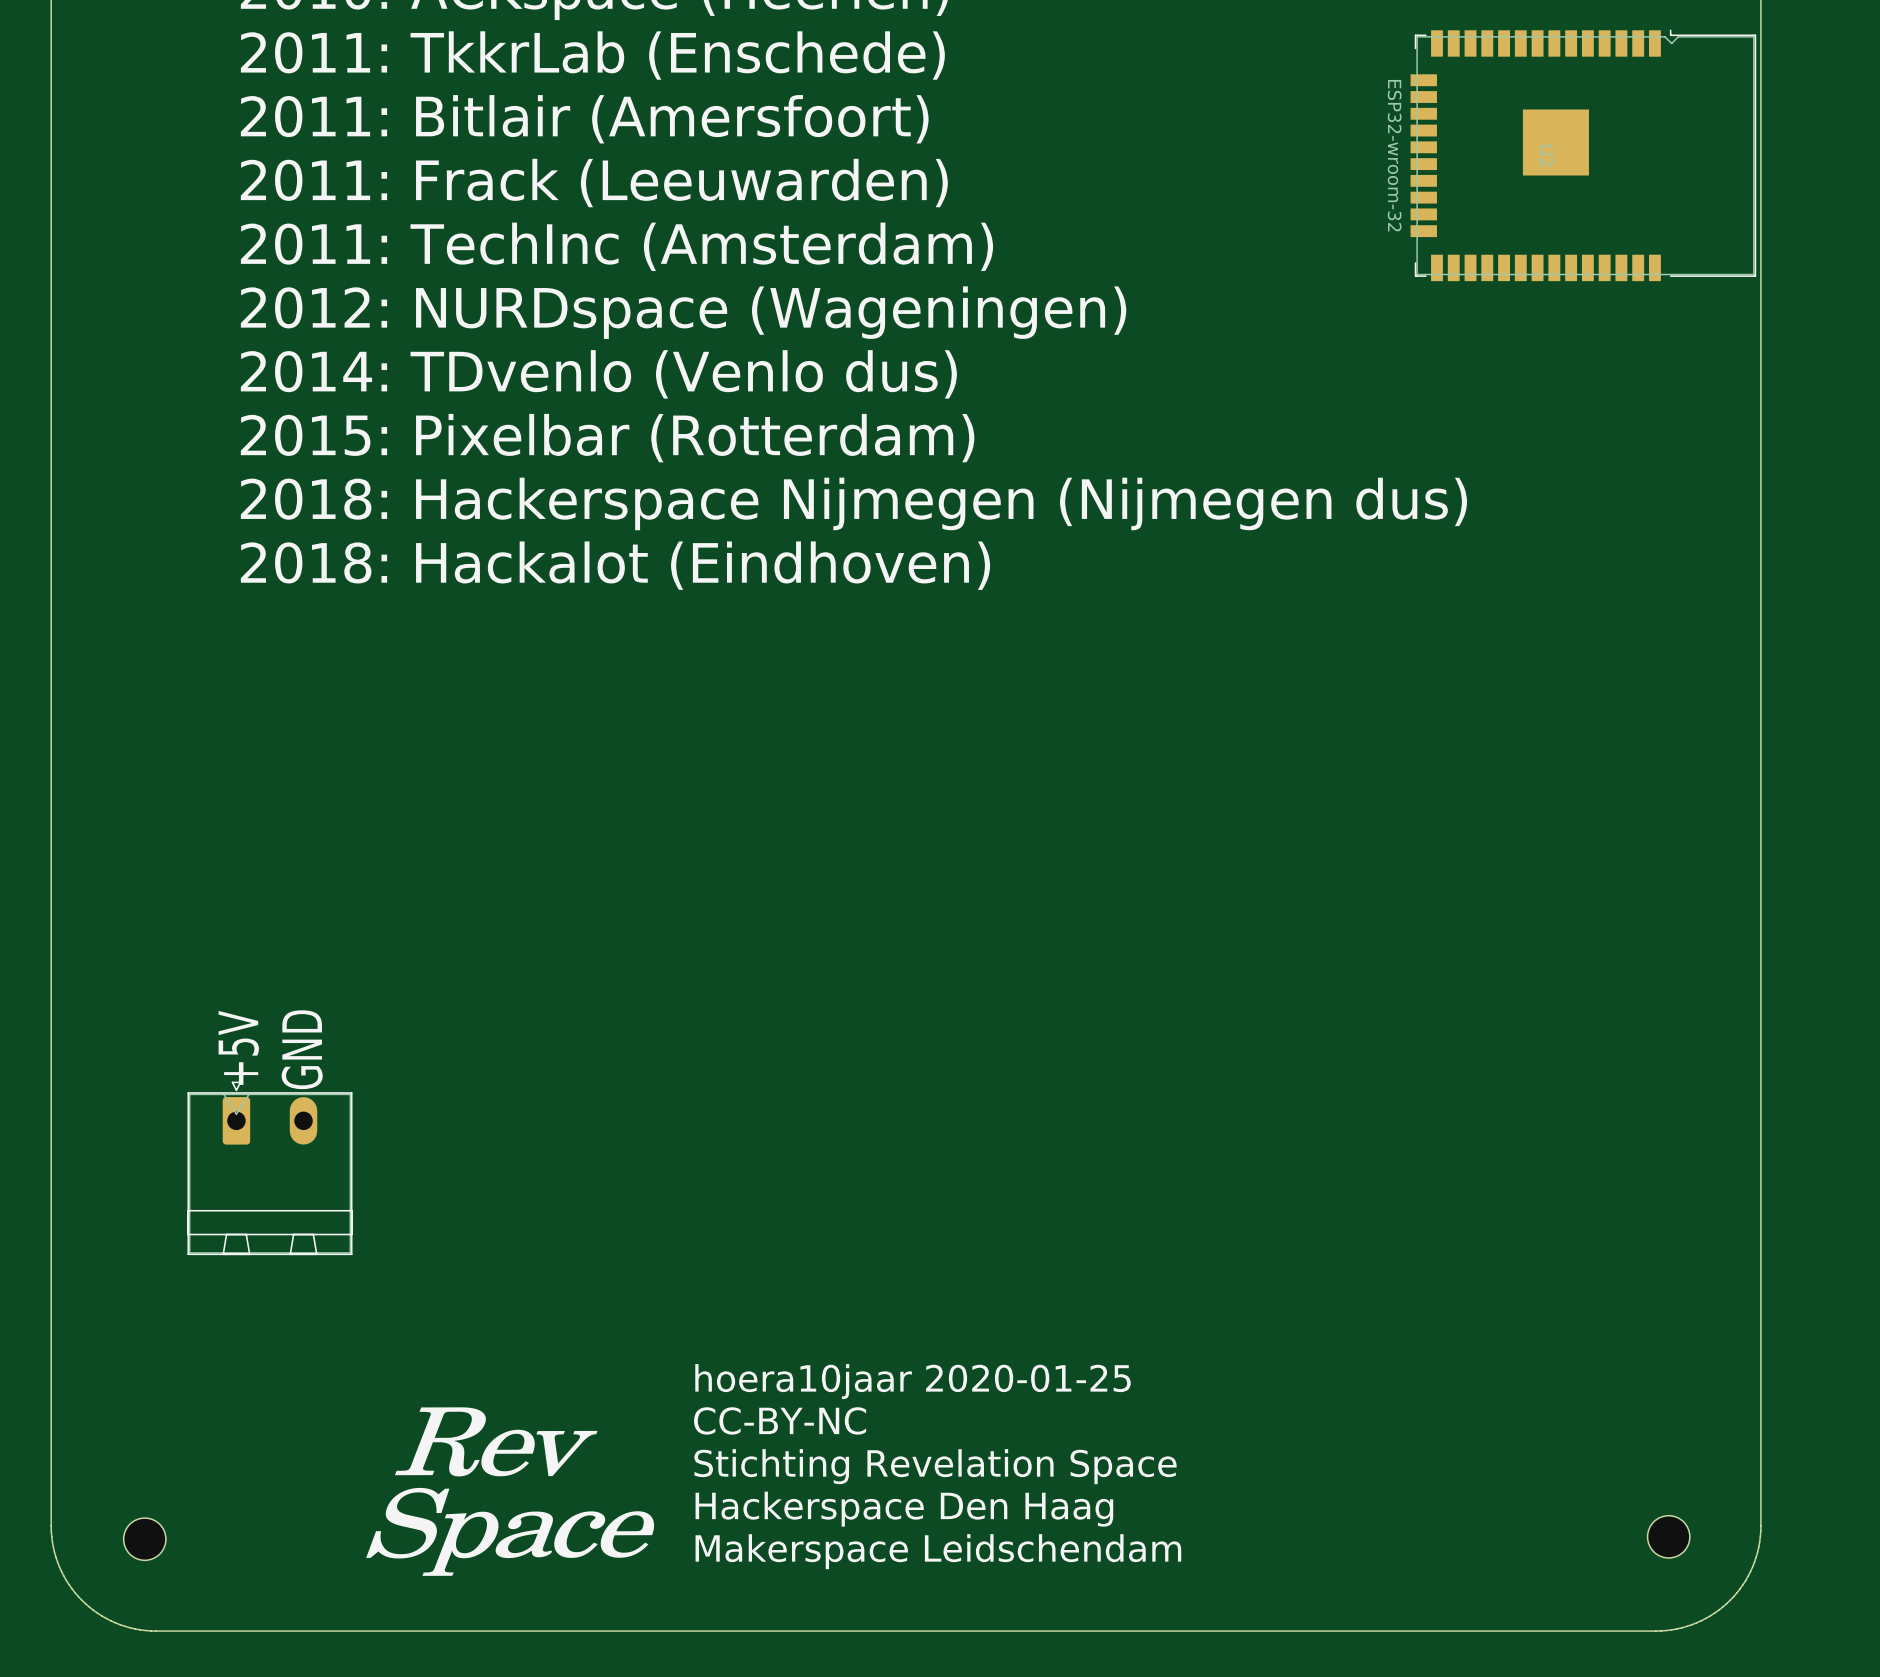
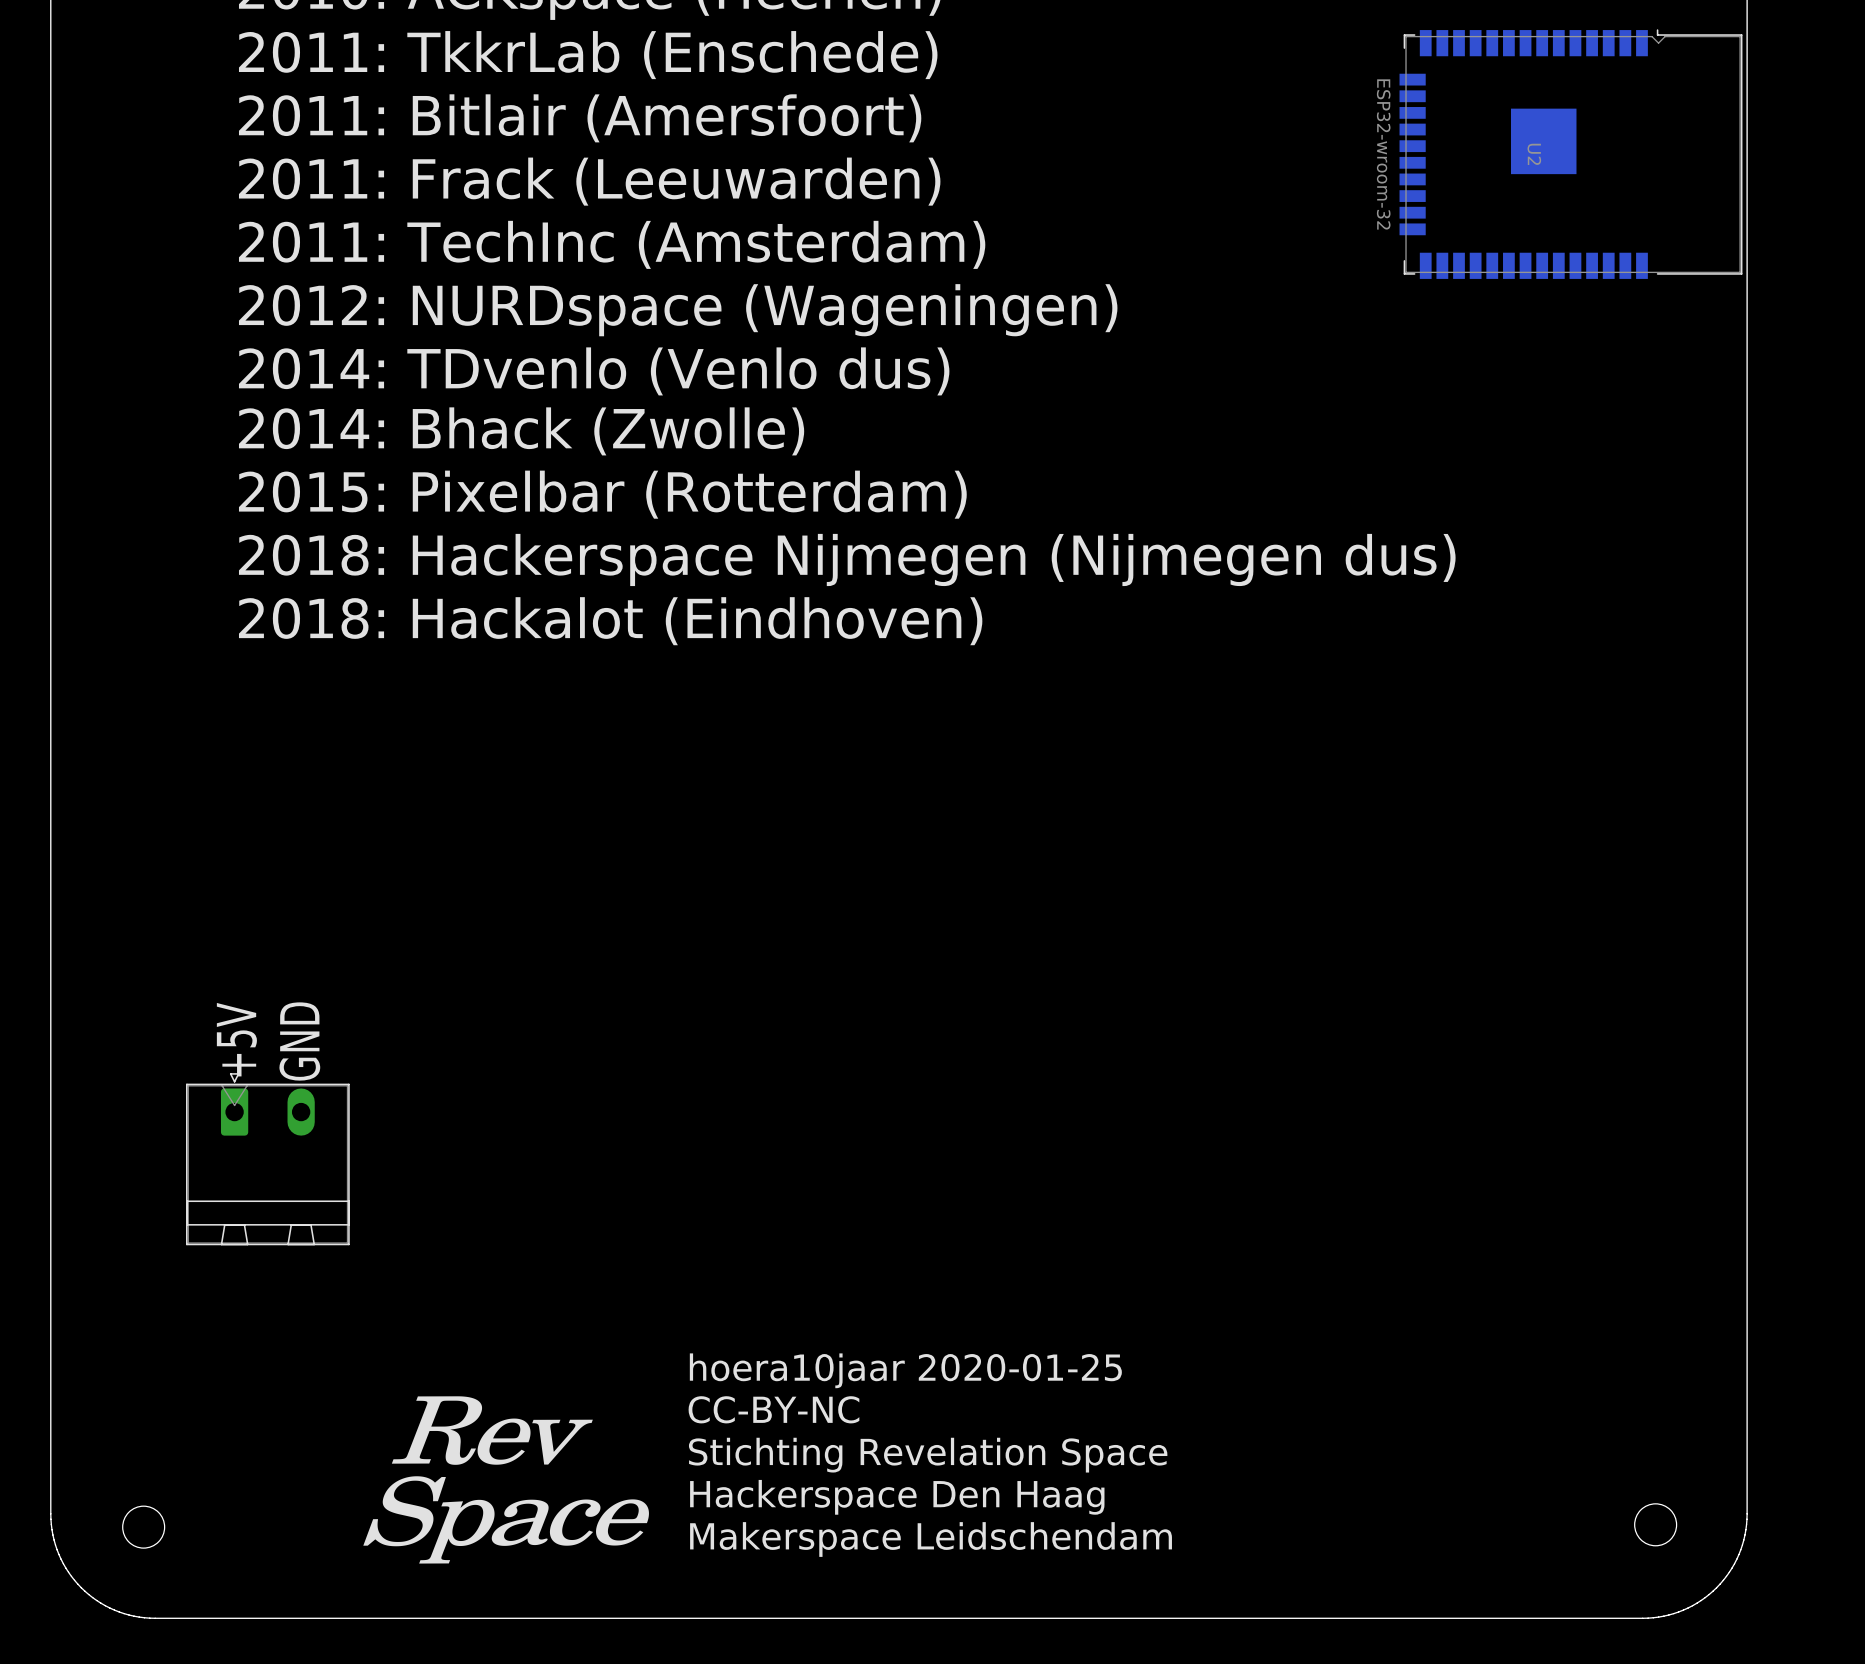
text: 2015: Pixelbar (Rotterdam) (607, 438) -> 2014: Bhack (Zwolle) (521, 431)
text: 2018: Hackerspace Nijmegen (Nijmegen dus) (853, 503) -> 2015: Pixelbar (Rotterdam) (602, 494)
text: 2018: Hackalot (Eindhoven) (615, 565) -> 2018: Hackerspace Nijmegen (Nijmegen dus) (847, 559)
text: none -> 2018: Hackalot (Eindhoven) (610, 621)

